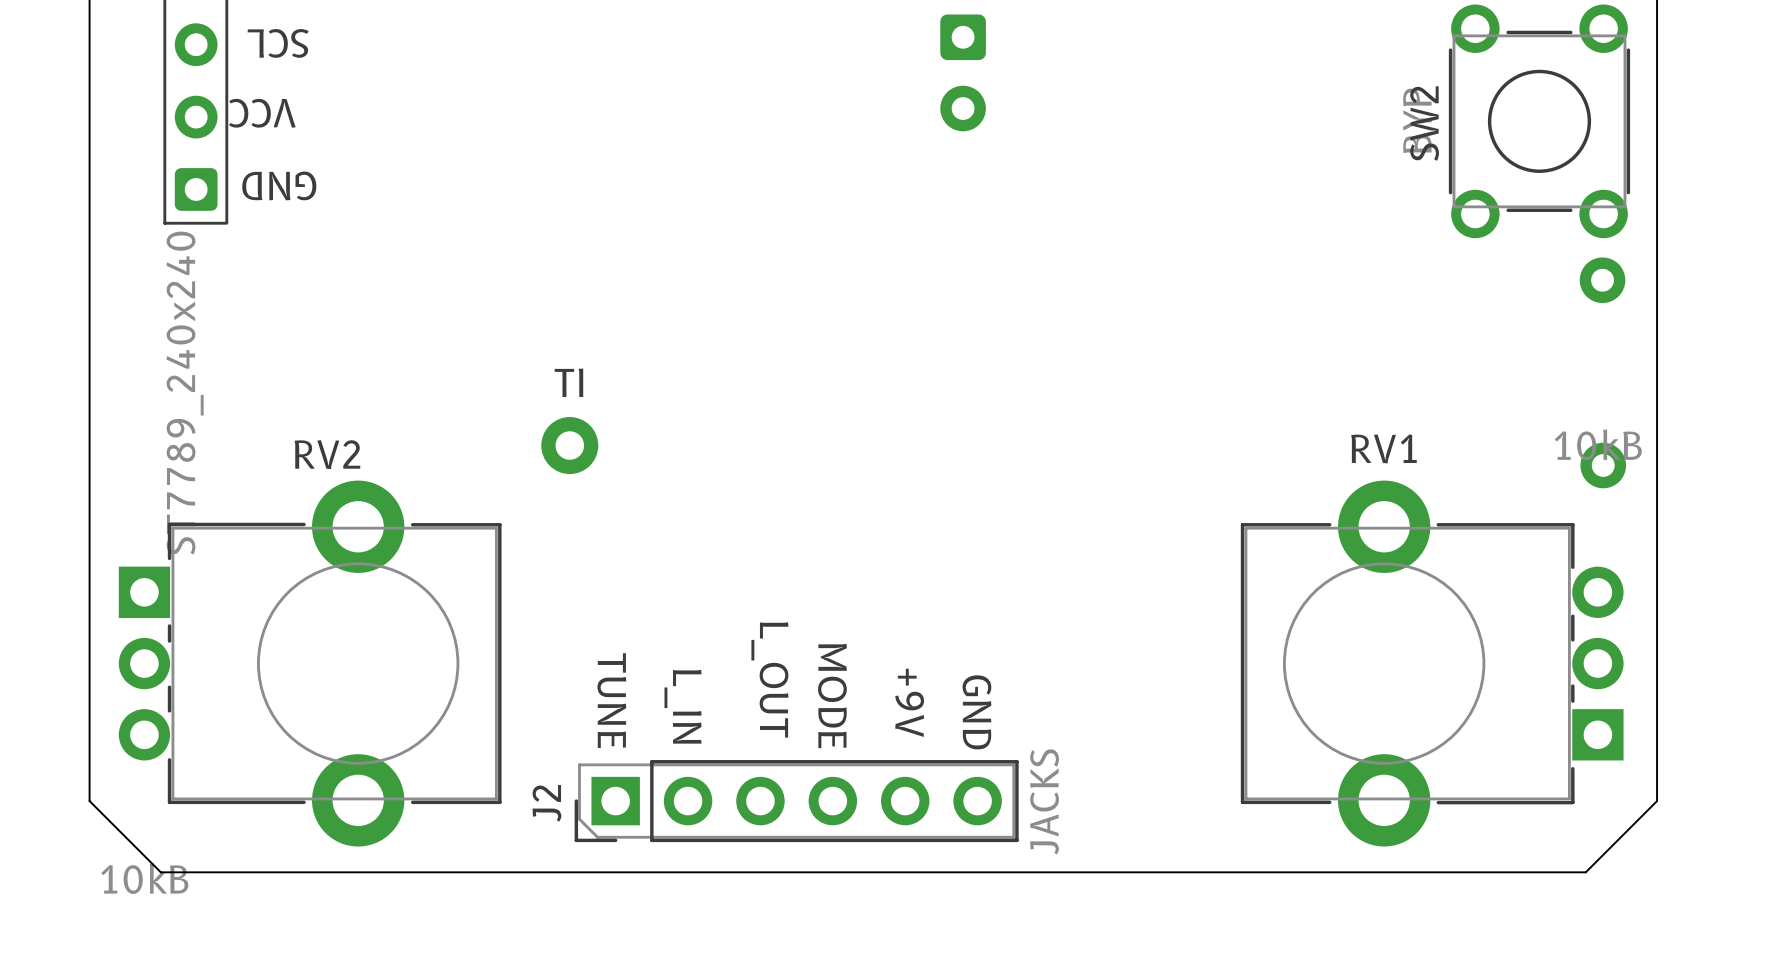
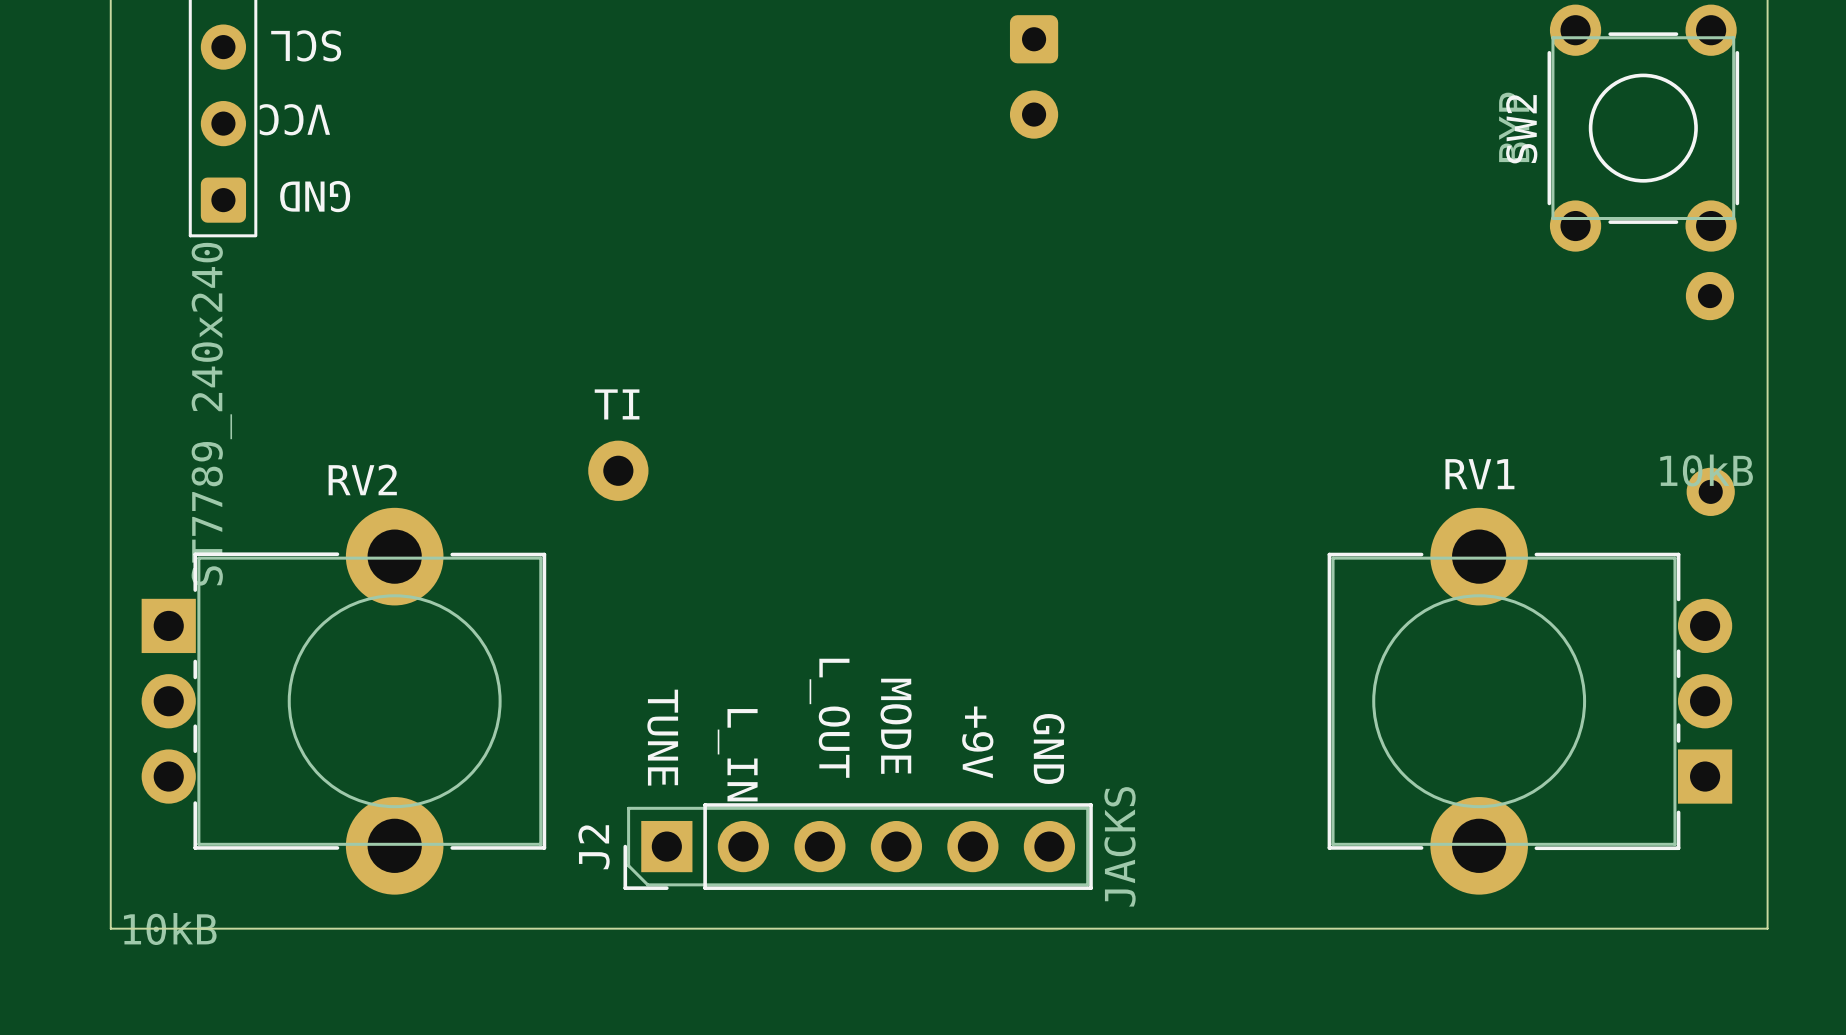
board edge: (89, 801) (160, 872) (1585, 872) (1657, 801) -> (110, 846) (110, 928) (1767, 928) (1767, 846)

